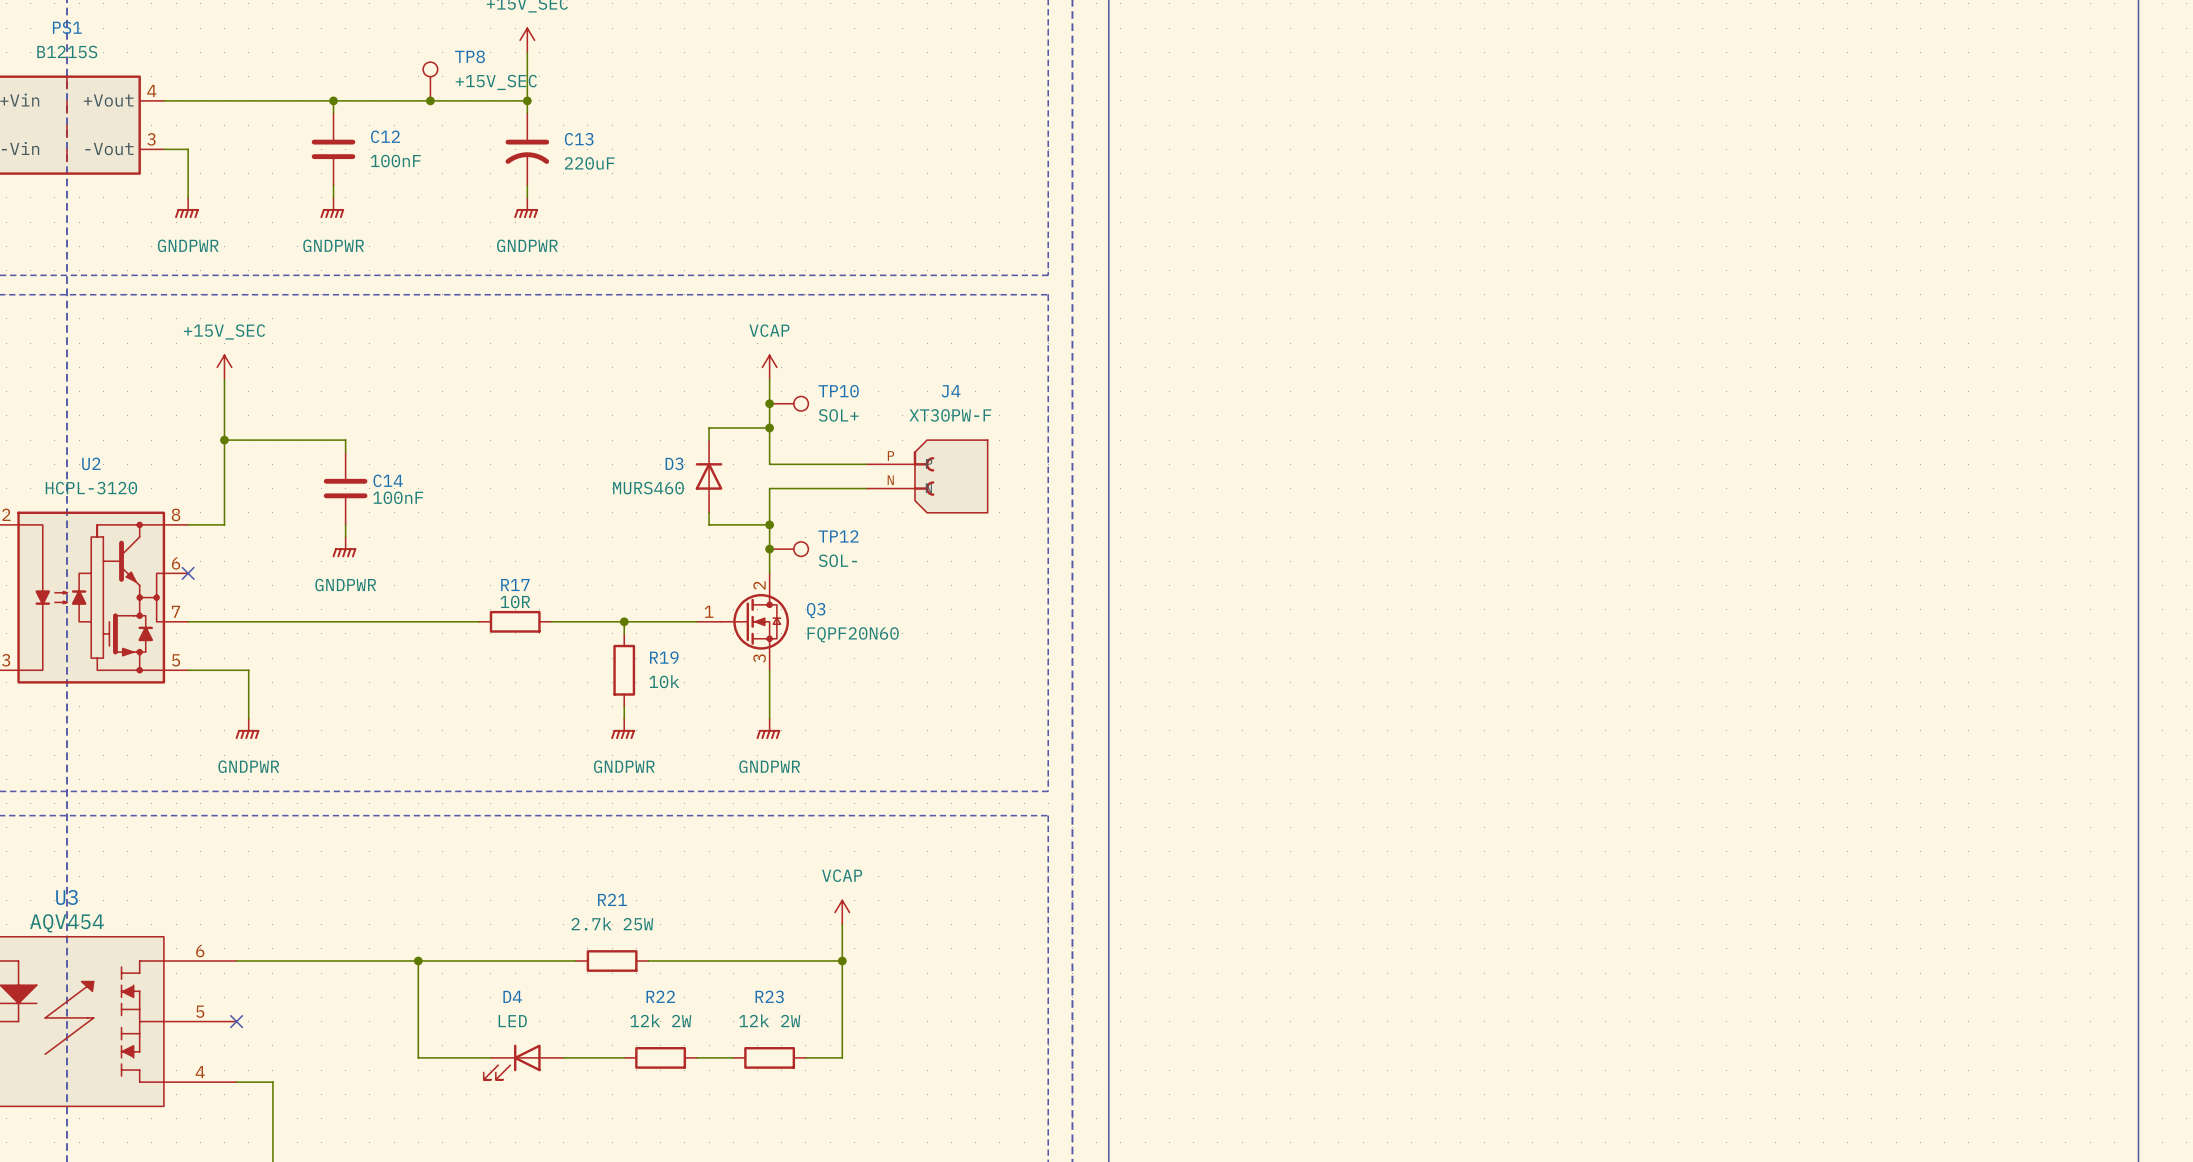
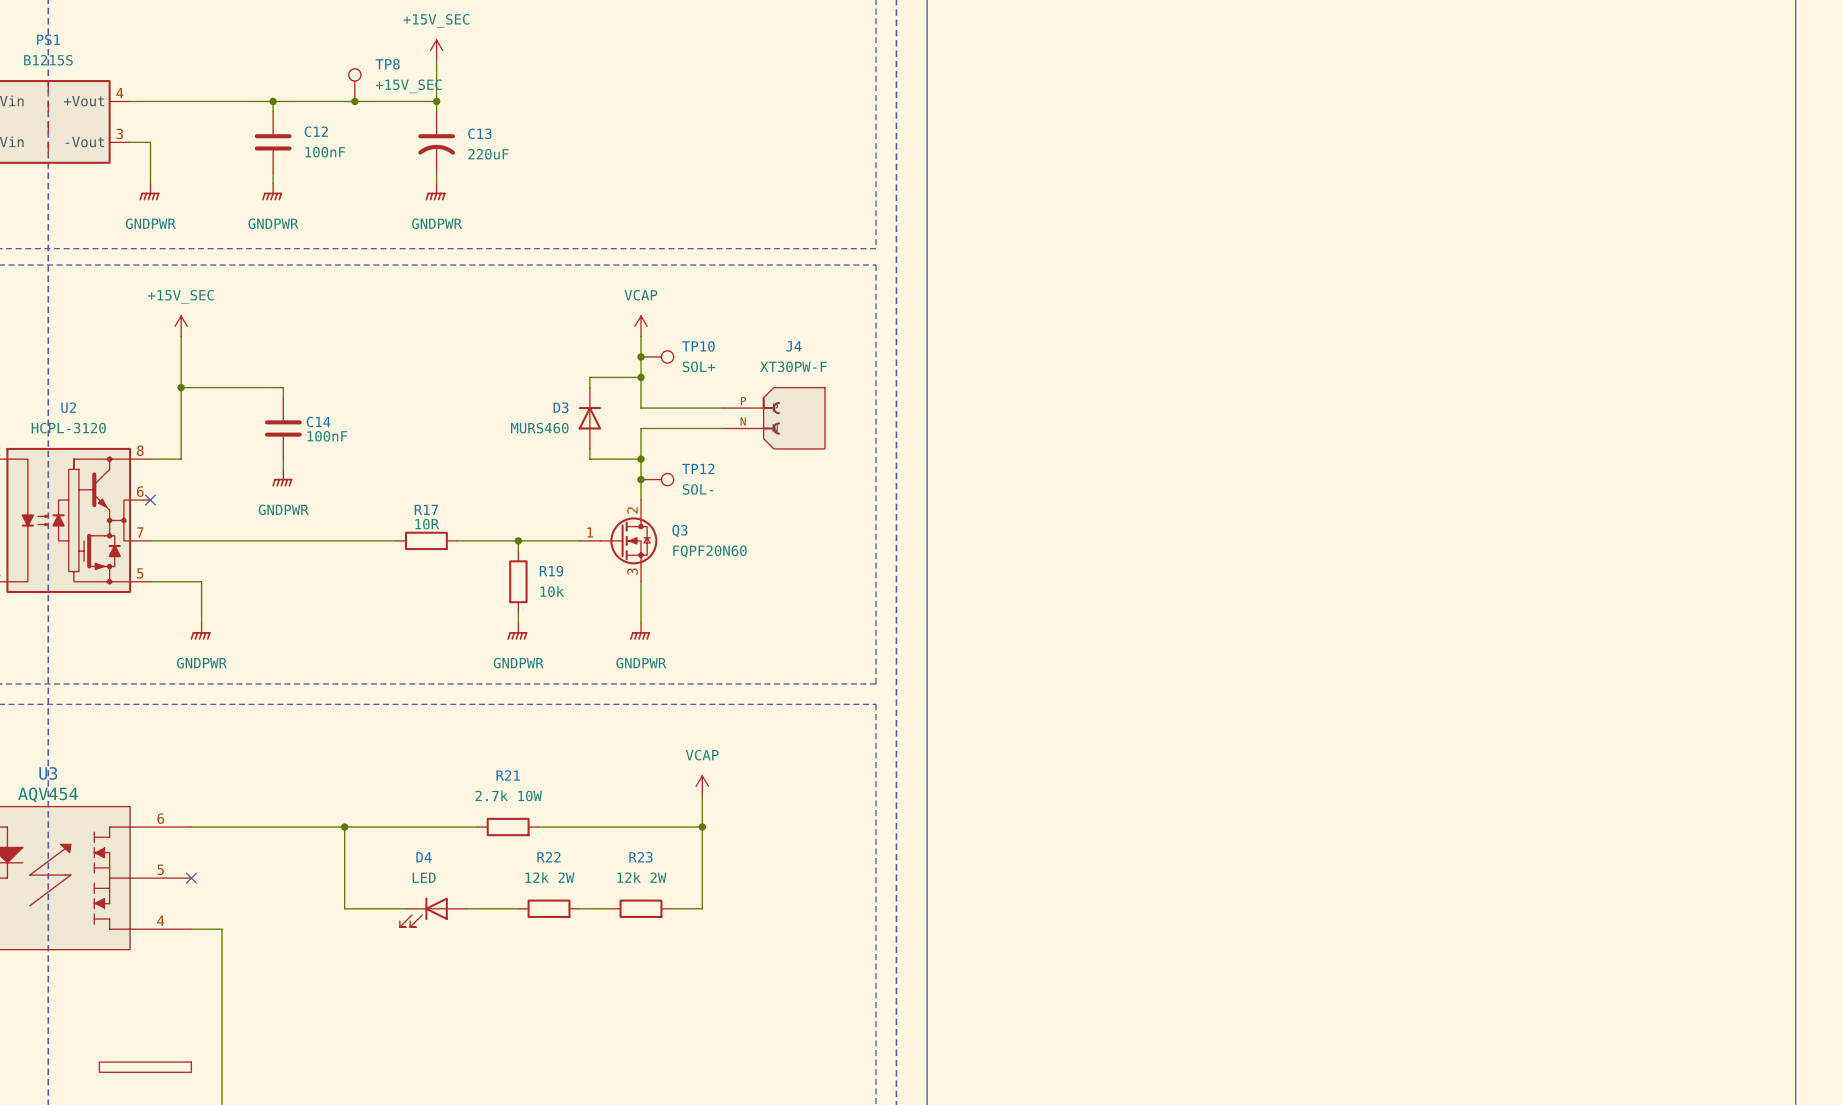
R21 value: 2.7k 25W (612, 923) -> 2.7k 10W (508, 795)

